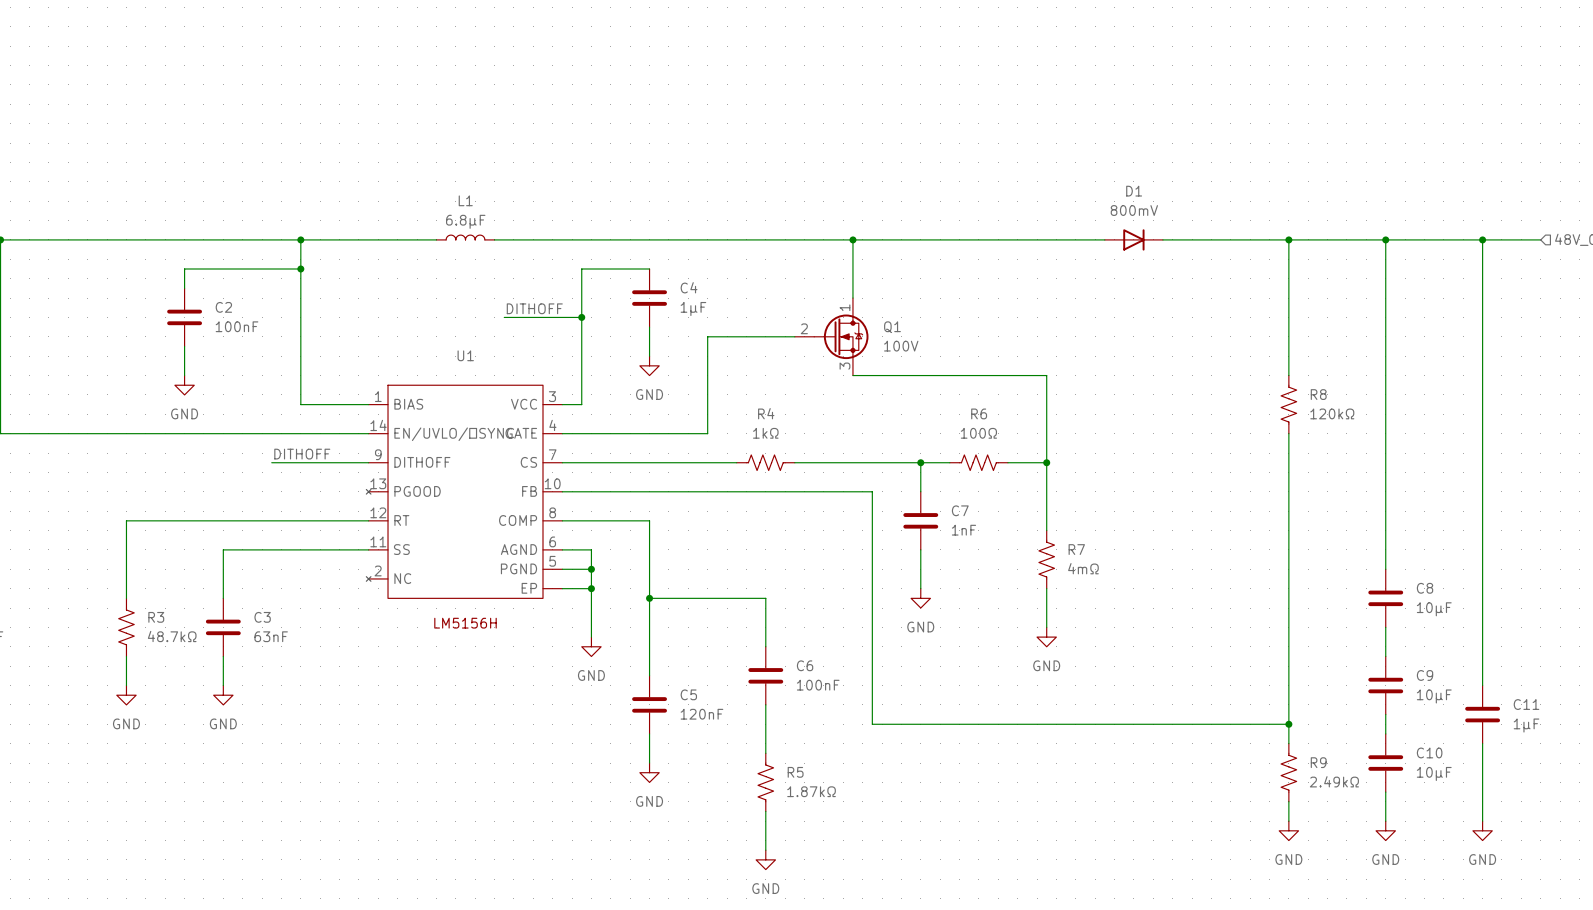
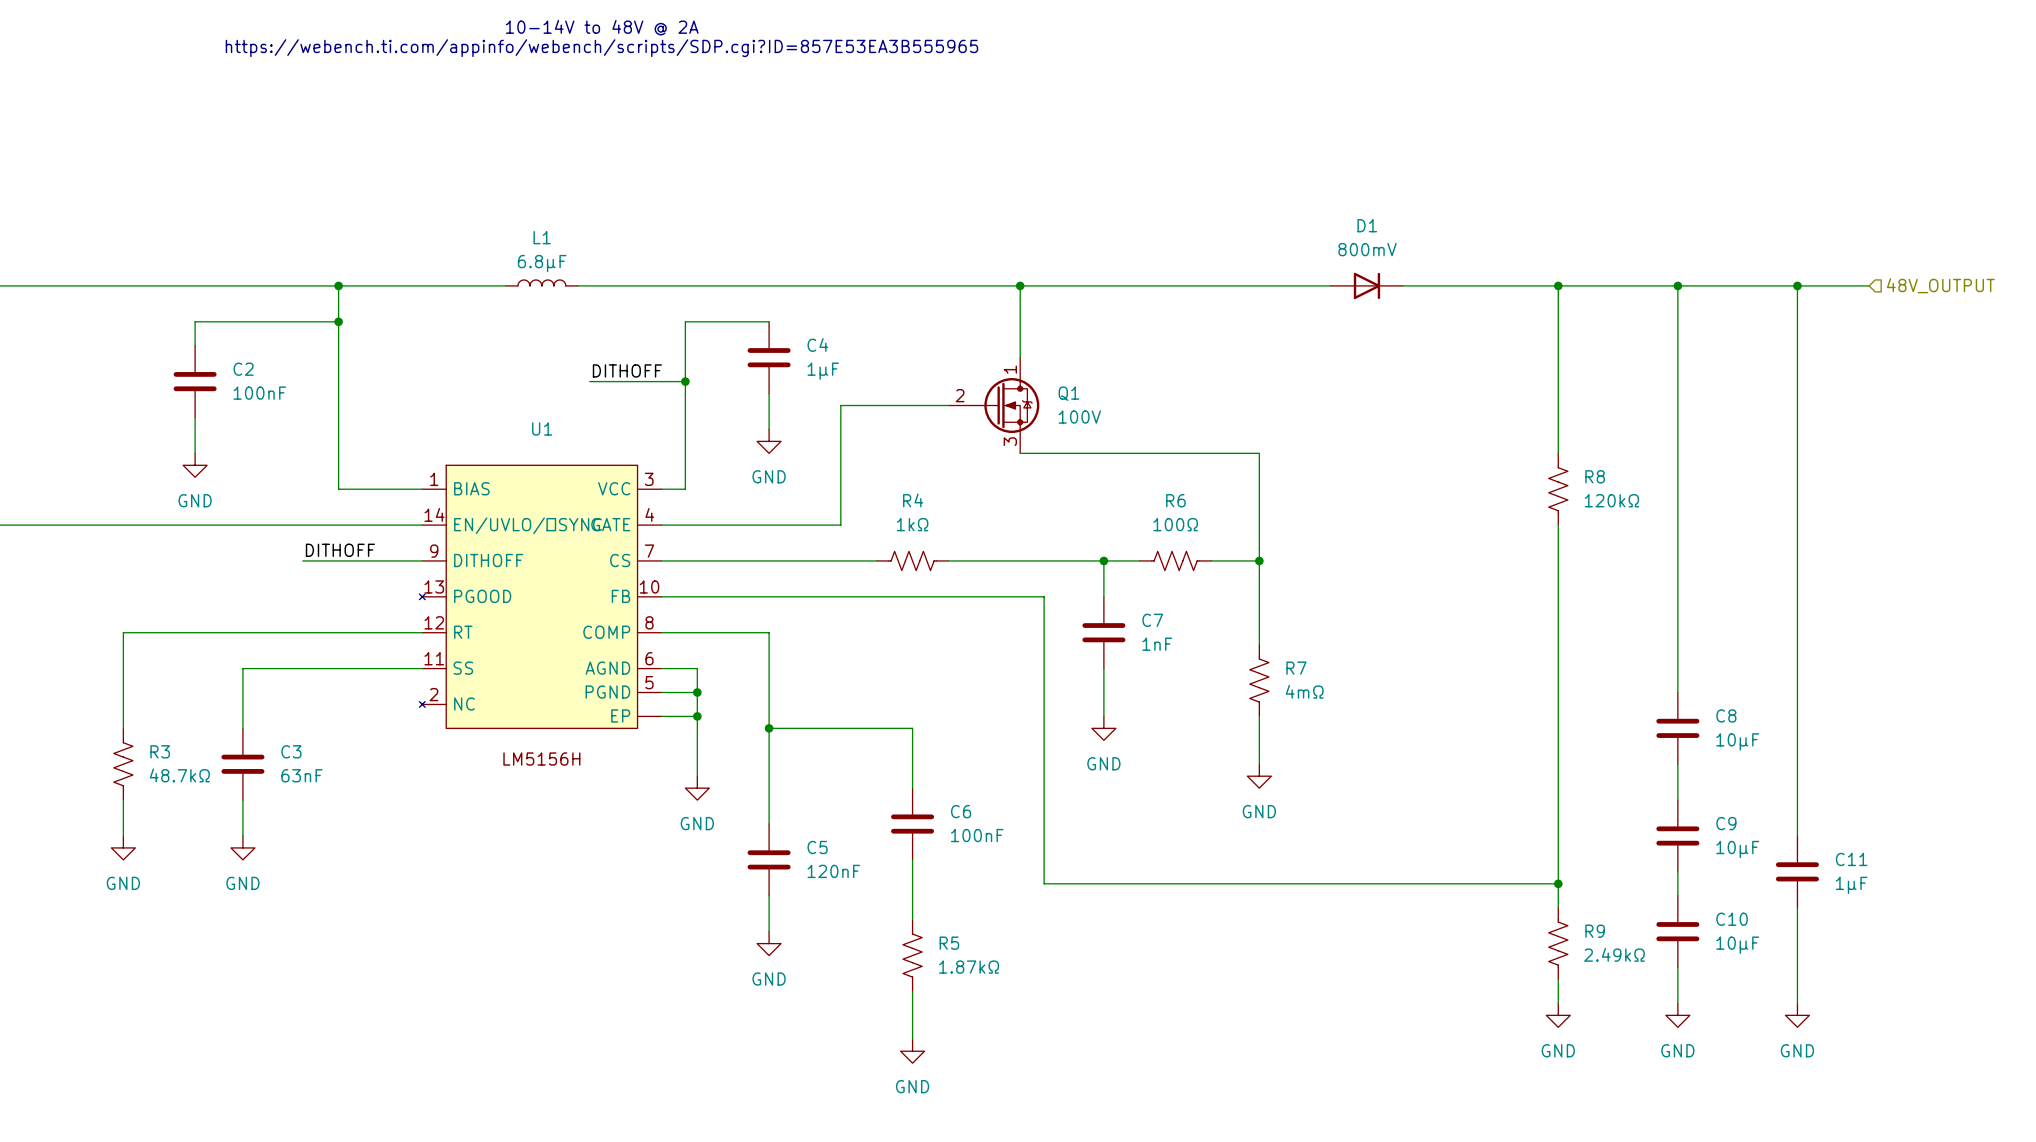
text: none -> 10-14V to 48V @ 2A (602, 27)
text: none -> https://webench.ti.com/appinfo/webench/scripts/SDP.cgi?ID=857E53EA3B555965 (601, 48)

